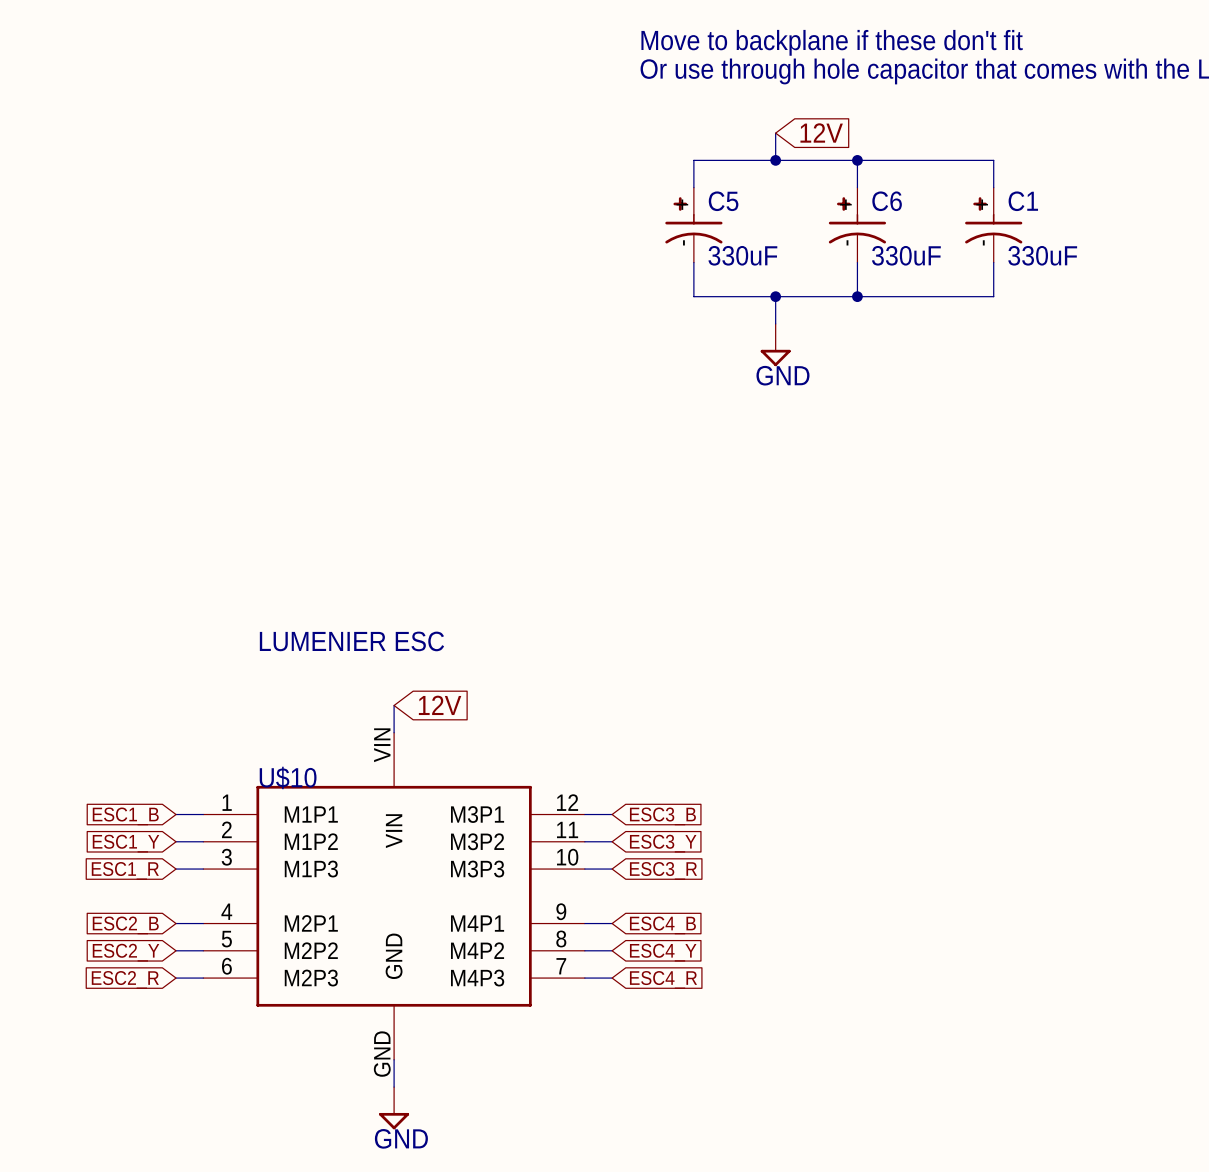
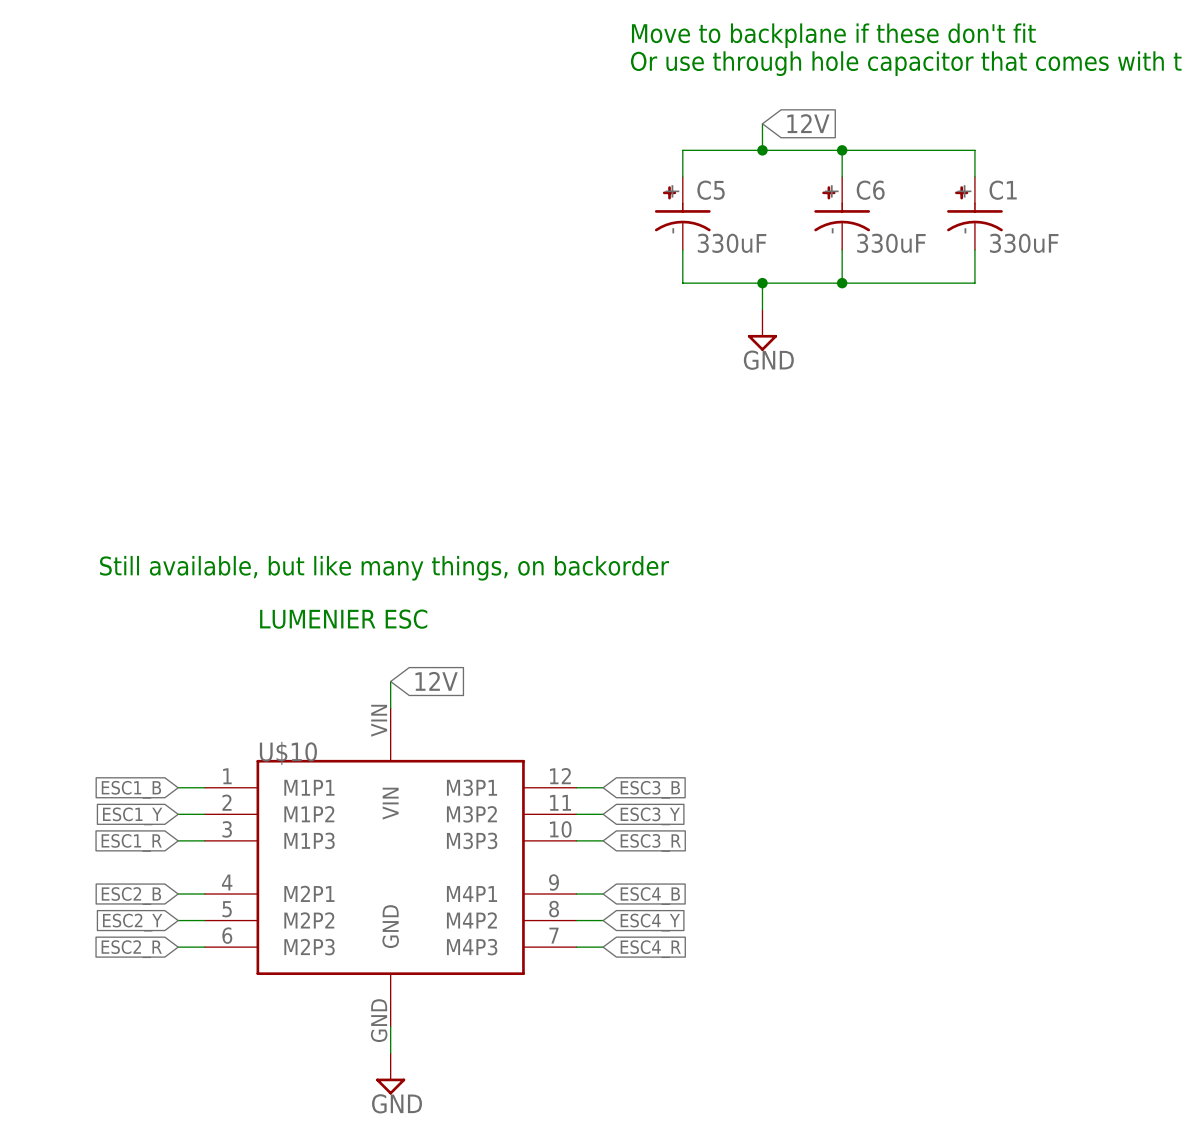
text: none -> Still available, but like many things, on backorder (384, 568)

